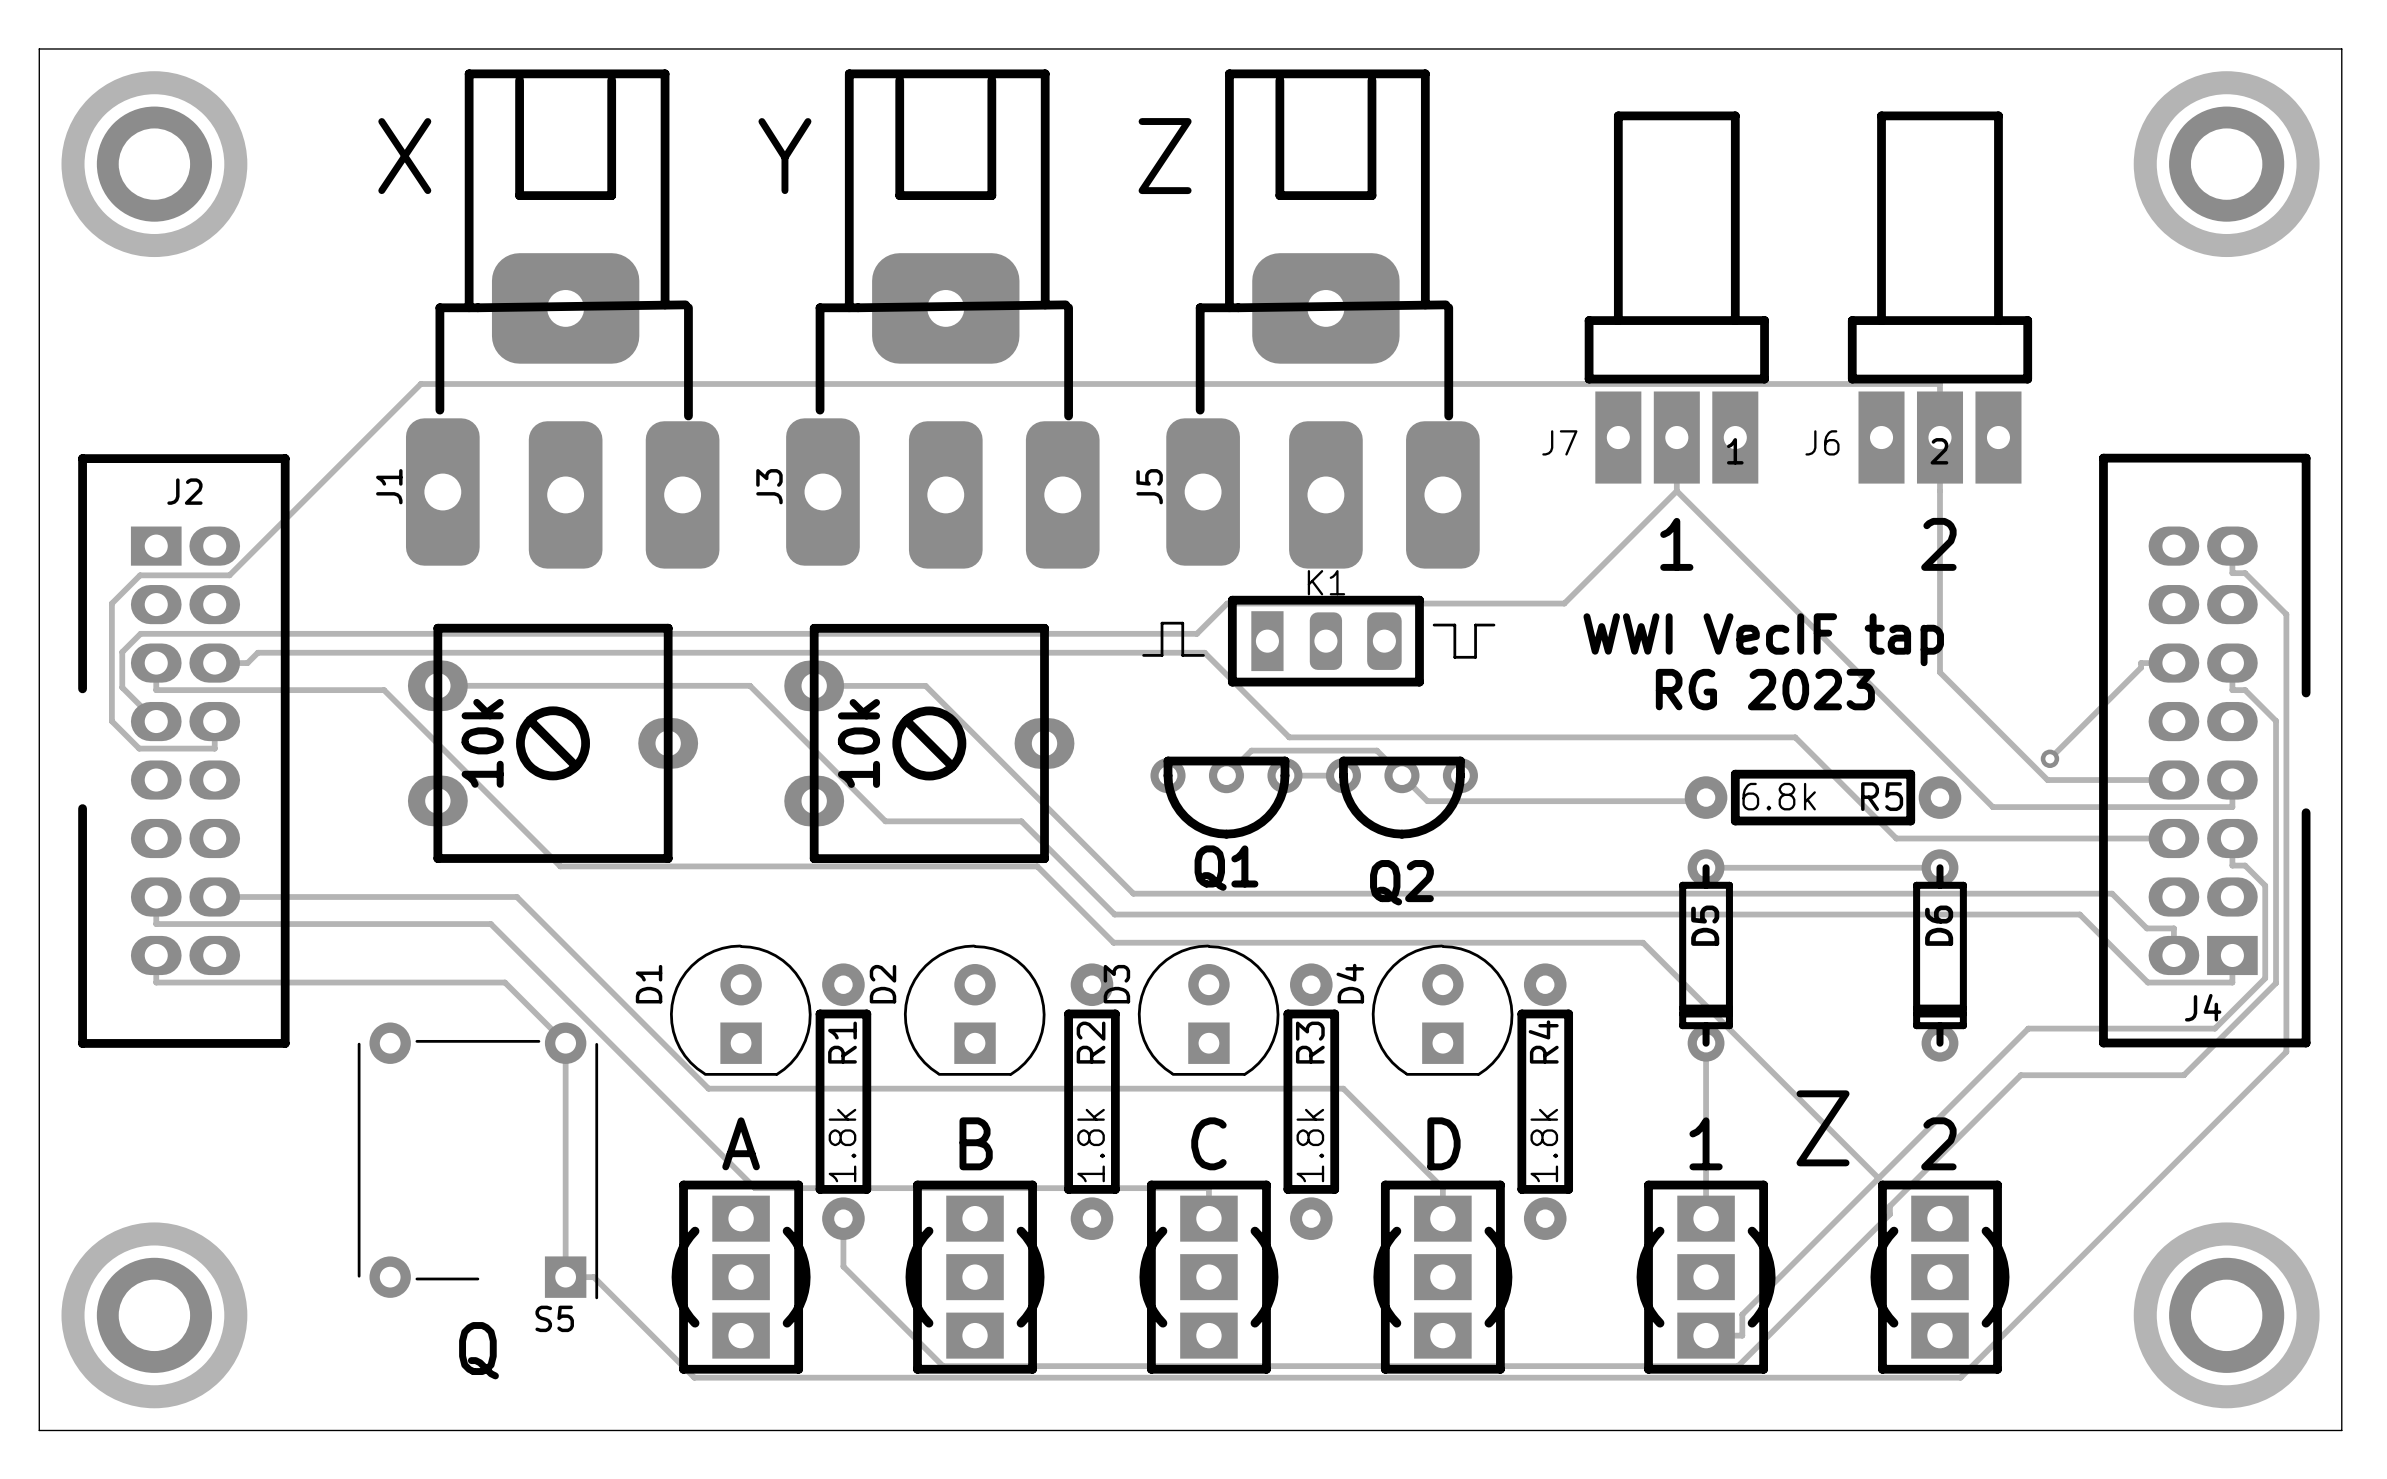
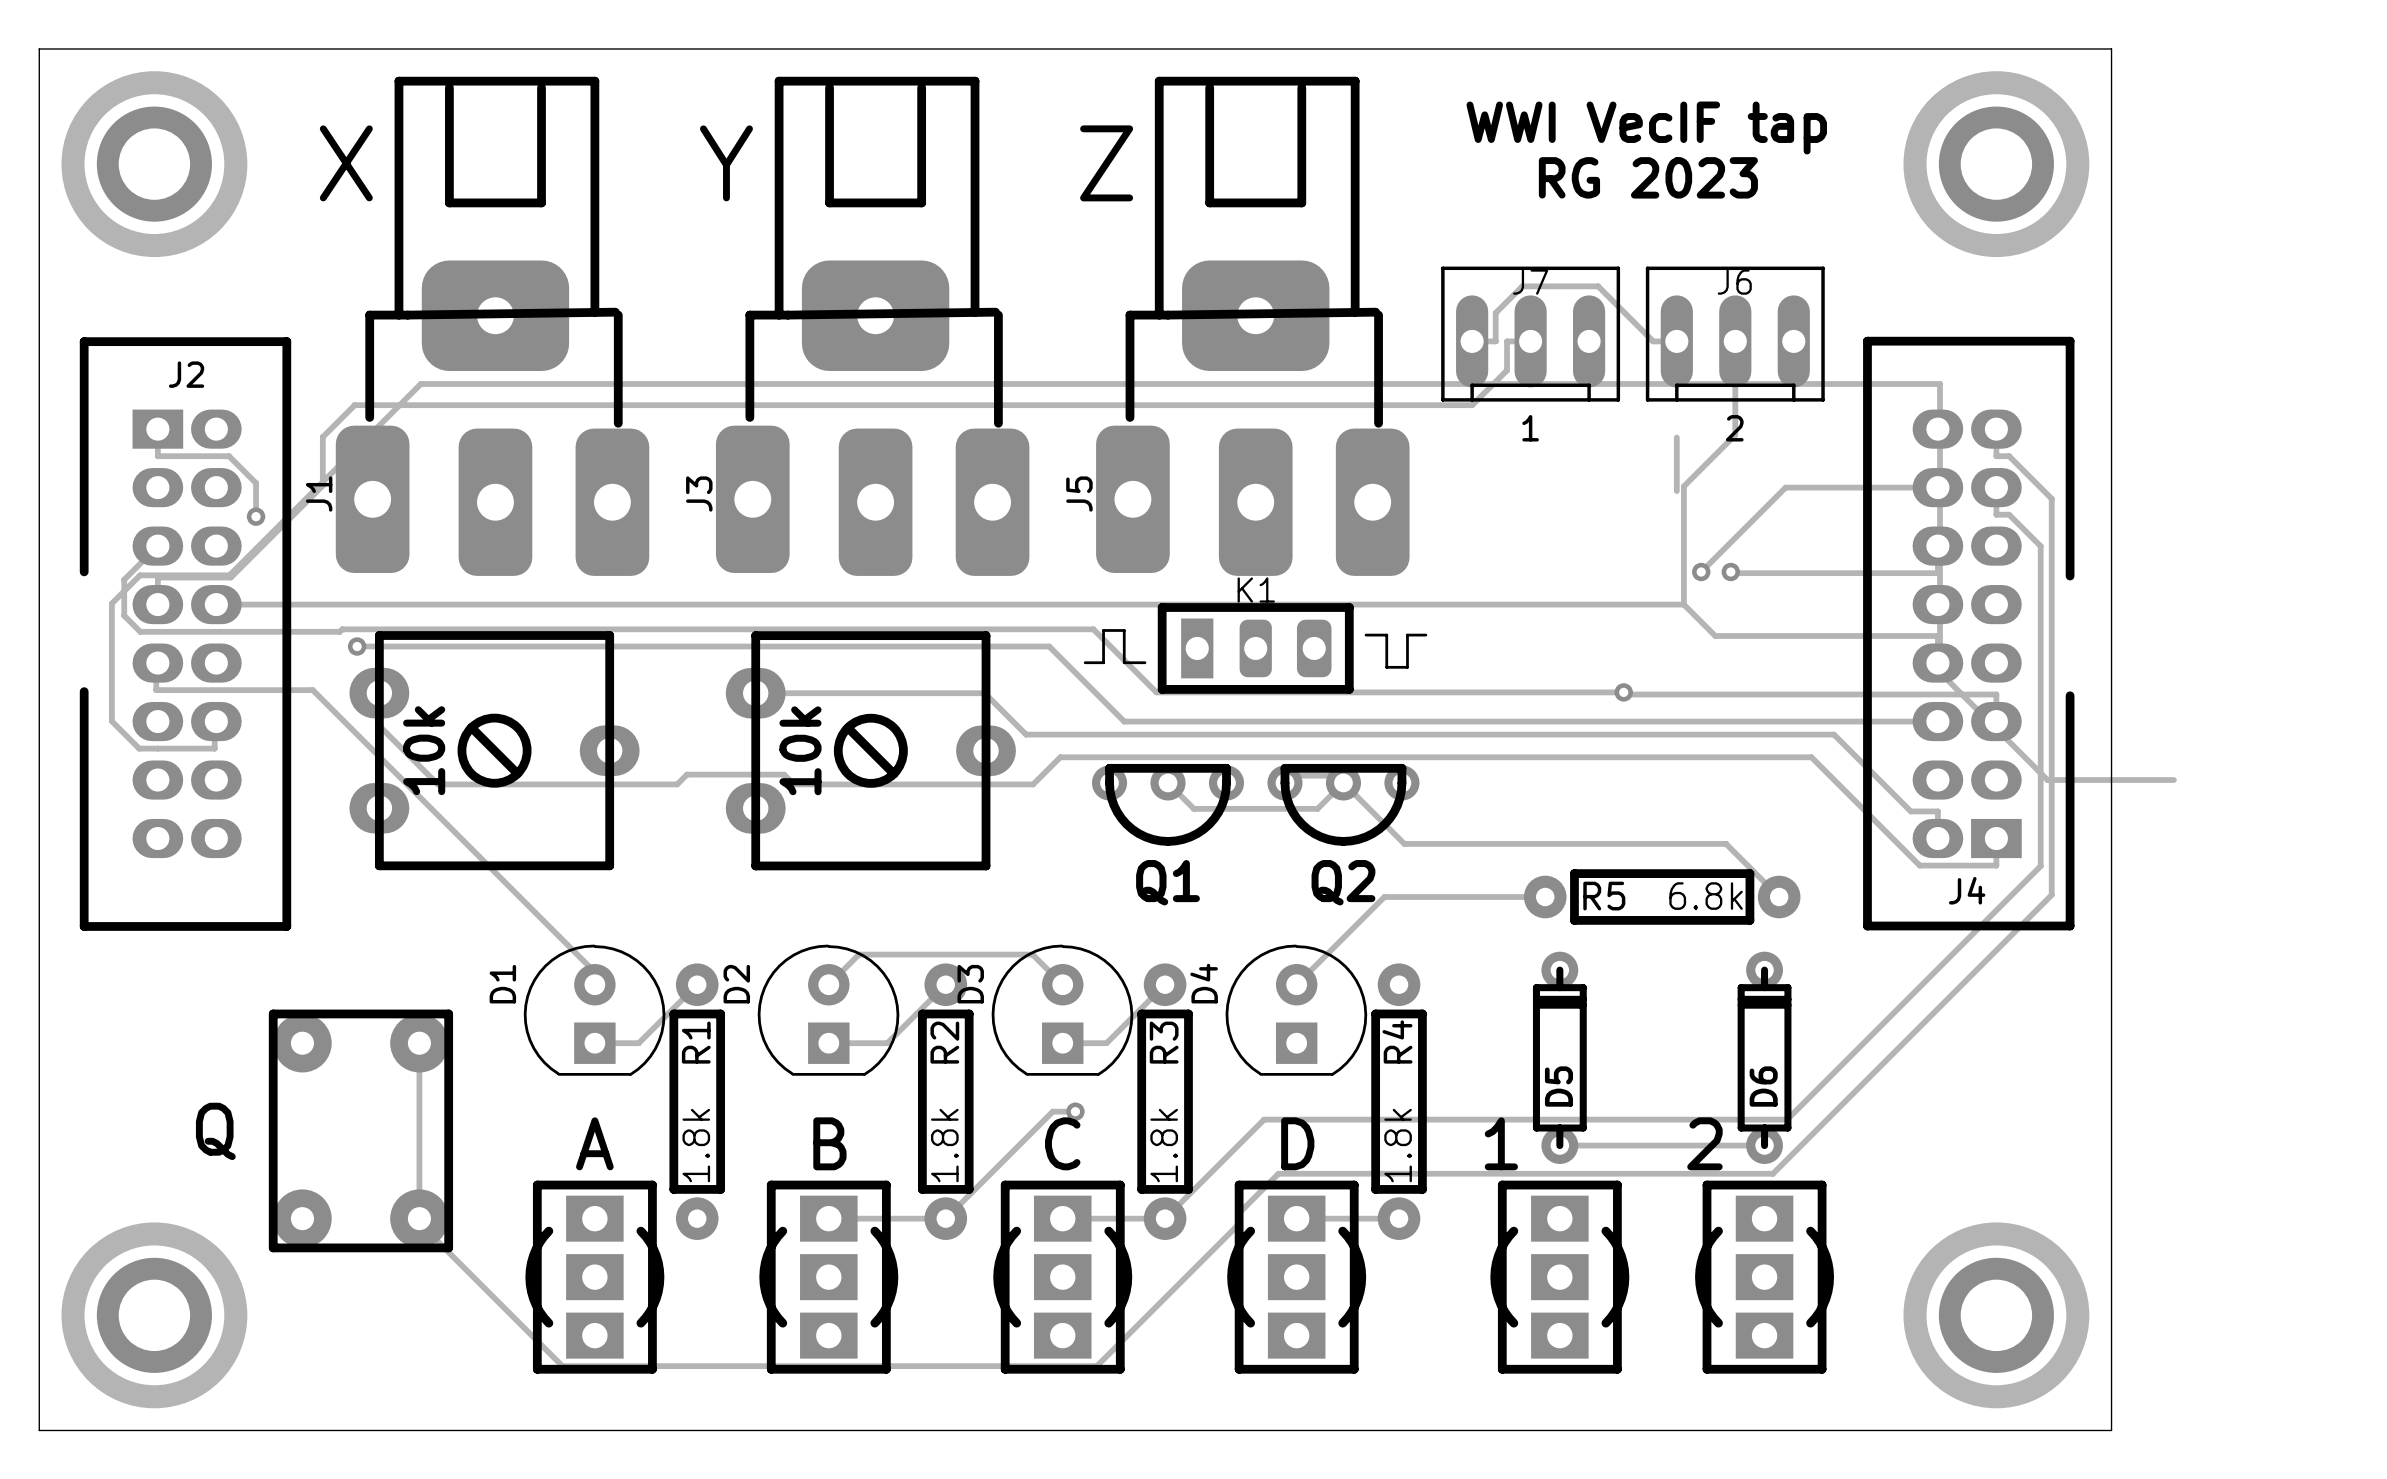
board edge: (2111, 48) (2341, 48) (2341, 1430) (2111, 1430) -> (2111, 48) (2111, 1430)
J7 footprint: [1584, 111, 1769, 484] -> [1441, 266, 1621, 402]
J6 footprint: [1847, 111, 2033, 484] -> [1645, 266, 1825, 402]
text position: X (404, 156) -> X (346, 163)
text position: Y (784, 156) -> Y (726, 163)
text position: Z (1165, 156) -> Z (1106, 163)
part position: (2226, 164) -> (1996, 164)
J1 position: (562, 319) -> (492, 326)
J3 position: (942, 319) -> (872, 326)
J5 position: (1322, 319) -> (1252, 326)
track: none -> (1472, 341) (1495, 341) (1495, 313) (1522, 286) (1598, 286) (1653, 341) (1676, 341)
track: none -> (1530, 341) (1507, 341) (1507, 370) (1472, 405) (354, 405) (322, 437) (322, 485) (230, 577) (157, 577) (157, 604)
track: none -> (1735, 341) (1735, 434) (1683, 486) (1683, 604)
text: none -> 1 (1530, 428)
text: none -> 2 (1734, 428)
track: none -> (157, 429) (157, 456) (229, 456) (256, 483) (256, 516)
J7 name position: J7 (1559, 442) -> J7 (1530, 282)
J6 name position: J6 (1822, 442) -> J6 (1734, 282)
text: 1 (1735, 451) -> none
text: 2 (1939, 451) -> none
track: none -> (1937, 487) (1785, 487) (1701, 572)
track: none -> (1996, 487) (1996, 514) (2009, 514) (2040, 546) (2040, 866) (1787, 1119) (1264, 1119) (1165, 1218) (1062, 1218)
via: none -> (256, 516)
text: 1 (1676, 544) -> none
text: 2 (1938, 544) -> none
track: none -> (157, 546) (124, 579) (124, 615) (140, 631) (339, 631) (342, 629) (1093, 629) (1156, 692) (1996, 694) (1996, 721)
track: none -> (1937, 546) (1937, 573) (1730, 571)
track: (2232, 546) (2232, 573) (2245, 573) (2286, 614) (2286, 1051) (1960, 1377) (694, 1377) (593, 1277) (565, 1277) (565, 1043) (504, 982) (156, 982) (156, 955) -> none
via: none -> (1730, 571)
via: none -> (1701, 572)
track: none -> (216, 604) (1683, 604)
track: none -> (1683, 604) (1715, 636) (1937, 636) (1937, 663)
line: (1434, 625) (1454, 625) (1454, 657) (1475, 657) (1475, 625) (1493, 625) -> (1366, 635) (1386, 635) (1386, 667) (1407, 667) (1407, 635) (1425, 635)
text position: WWI VecIF tap (1763, 639) -> WWI VecIF tap (1646, 128)
K1 position: (1325, 641) -> (1255, 648)
track: none -> (357, 646) (1049, 646) (1124, 721) (1937, 721)
via: none -> (357, 646)
line: (1143, 655) (1162, 655) (1162, 623) (1182, 623) (1182, 655) (1203, 655) -> (1085, 662) (1103, 662) (1103, 630) (1124, 630) (1124, 662) (1144, 662)
track: (214, 663) (247, 663) (257, 652) (1204, 652) (1289, 737) (1795, 737) (1896, 838) (2173, 838) -> none
track: (2173, 663) (2141, 663) (2141, 667) (2049, 758) -> none
track: (2232, 663) (2232, 690) (2245, 690) (2276, 721) (2276, 983) (2183, 1075) (2020, 1075) (1889, 1206) (1889, 1214) (1738, 1366) (1096, 1366) -> (1996, 429) (1996, 456) (2009, 456) (2051, 498) (2051, 895) (1773, 1173) (1278, 1173) (1240, 1212) (1240, 1223) (1096, 1366)
track: (437, 685) (749, 685) (885, 821) (1021, 821) (1114, 914) (2079, 914) (2147, 982) (2232, 982) (2232, 955) -> none
track: (814, 685) (925, 685) (1133, 893) (2112, 893) (2146, 928) (2173, 928) (2173, 955) -> none
text position: RG 2023 (1765, 689) -> RG 2023 (1648, 177)
track: (312, 690) (384, 690) (560, 866) (1037, 866) (1113, 942) (1643, 942) (1878, 1178) -> (312, 690) (594, 972) (594, 984)
via: none -> (1623, 692)
track: none -> (379, 693) (379, 725) (437, 784) (677, 784) (687, 774) (784, 774) (793, 784) (1033, 784) (1060, 757) (1811, 757) (1919, 865) (1996, 865) (1996, 838)
track: none -> (755, 693) (984, 693) (1026, 734) (1834, 734) (1910, 811) (1937, 811) (1937, 838)
track: (156, 721) (122, 687) (122, 652) (140, 633) (1196, 633) (1227, 603) (1564, 603) (1676, 491) (1992, 807) (2232, 807) (2232, 780) -> none
part position: (553, 743) -> (494, 750)
part position: (929, 743) -> (870, 750)
J4 position: (2204, 750) -> (1968, 633)
J2 position: (183, 751) -> (185, 634)
via: (2049, 758) -> none
track: (1226, 775) (1251, 750) (1376, 750) (1427, 801) (1702, 801) (1706, 797) -> none
track: none -> (1168, 782) (1193, 808) (1317, 808) (1343, 782) (1404, 843) (1726, 843) (1779, 897)
R5 value position: 6.8k (1779, 796) -> 6.8k (1706, 896)
R5 name position: R5 (1882, 796) -> R5 (1604, 896)
Q1 position: (1226, 797) -> (1168, 804)
Q2 position: (1401, 797) -> (1343, 804)
R5 position: (1823, 797) -> (1662, 897)
track: (2232, 838) (2232, 865) (2245, 865) (2265, 885) (2265, 978) (2214, 1028) (2028, 1028) (1742, 1314) (1742, 1335) (1706, 1335) -> none
track: (1706, 867) (1939, 867) -> none
Q1 name position: Q1 (1226, 868) -> Q1 (1168, 882)
Q2 name position: Q2 (1401, 882) -> Q2 (1343, 882)
track: (156, 897) (156, 924) (490, 924) (754, 1188) (1208, 1188) (1208, 1218) -> none
track: (214, 897) (516, 897) (708, 1088) (1343, 1088) (1442, 1188) (1442, 1218) -> none
track: none -> (1545, 897) (1384, 897) (1296, 984)
D5 rotation: 0° (1706, 955) -> 180° (1559, 1057)
D5 position: (1706, 955) -> (1559, 1057)
D6 rotation: 0° (1939, 955) -> 180° (1764, 1057)
D6 position: (1939, 955) -> (1764, 1057)
track: none -> (697, 984) (638, 1043) (594, 1043)
track: none -> (828, 984) (858, 954) (1032, 954) (1062, 984)
track: none -> (945, 984) (887, 1043) (828, 1043)
track: none -> (1165, 984) (1106, 1043) (1062, 1043)
D1 position: (740, 1010) -> (594, 1010)
D2 position: (974, 1010) -> (828, 1010)
D3 position: (1208, 1010) -> (1062, 1010)
D4 position: (1442, 1010) -> (1296, 1010)
track: (1706, 1043) (1706, 1218) -> none
R1 position: (843, 1101) -> (697, 1101)
R2 position: (1091, 1101) -> (945, 1101)
R3 position: (1311, 1101) -> (1165, 1101)
R4 position: (1545, 1101) -> (1399, 1101)
track: none -> (1075, 1111) (1052, 1111) (945, 1218) (828, 1218)
via: none -> (1075, 1111)
text: Z (1823, 1128) -> none
part: none -> (360, 1130)
text position: A (741, 1143) -> A (594, 1143)
text position: B (976, 1143) -> B (829, 1143)
text position: C (1208, 1143) -> C (1062, 1143)
text position: D (1443, 1143) -> D (1297, 1143)
text: none -> 1 (1501, 1143)
text: 1 (1706, 1143) -> 2 (1704, 1143)
text: 2 (1938, 1143) -> none
track: none -> (1559, 1145) (1764, 1145)
S5: (477, 1160) -> none
track: (843, 1218) (843, 1266) (942, 1366) -> (419, 1043) (419, 1223) (562, 1366) (942, 1366)
track: none -> (1296, 1218) (1399, 1218)
part: none -> (594, 1277)
part: (741, 1277) -> none
part: none -> (828, 1277)
part: (975, 1277) -> none
part: none -> (1062, 1277)
part: (1208, 1277) -> none
part: none -> (1296, 1277)
part: (1442, 1277) -> none
part: none -> (1559, 1277)
part position: (1706, 1277) -> (1764, 1277)
part: (1939, 1277) -> none
part position: (2226, 1315) -> (1996, 1315)
text position: Q (479, 1350) -> Q (215, 1131)

